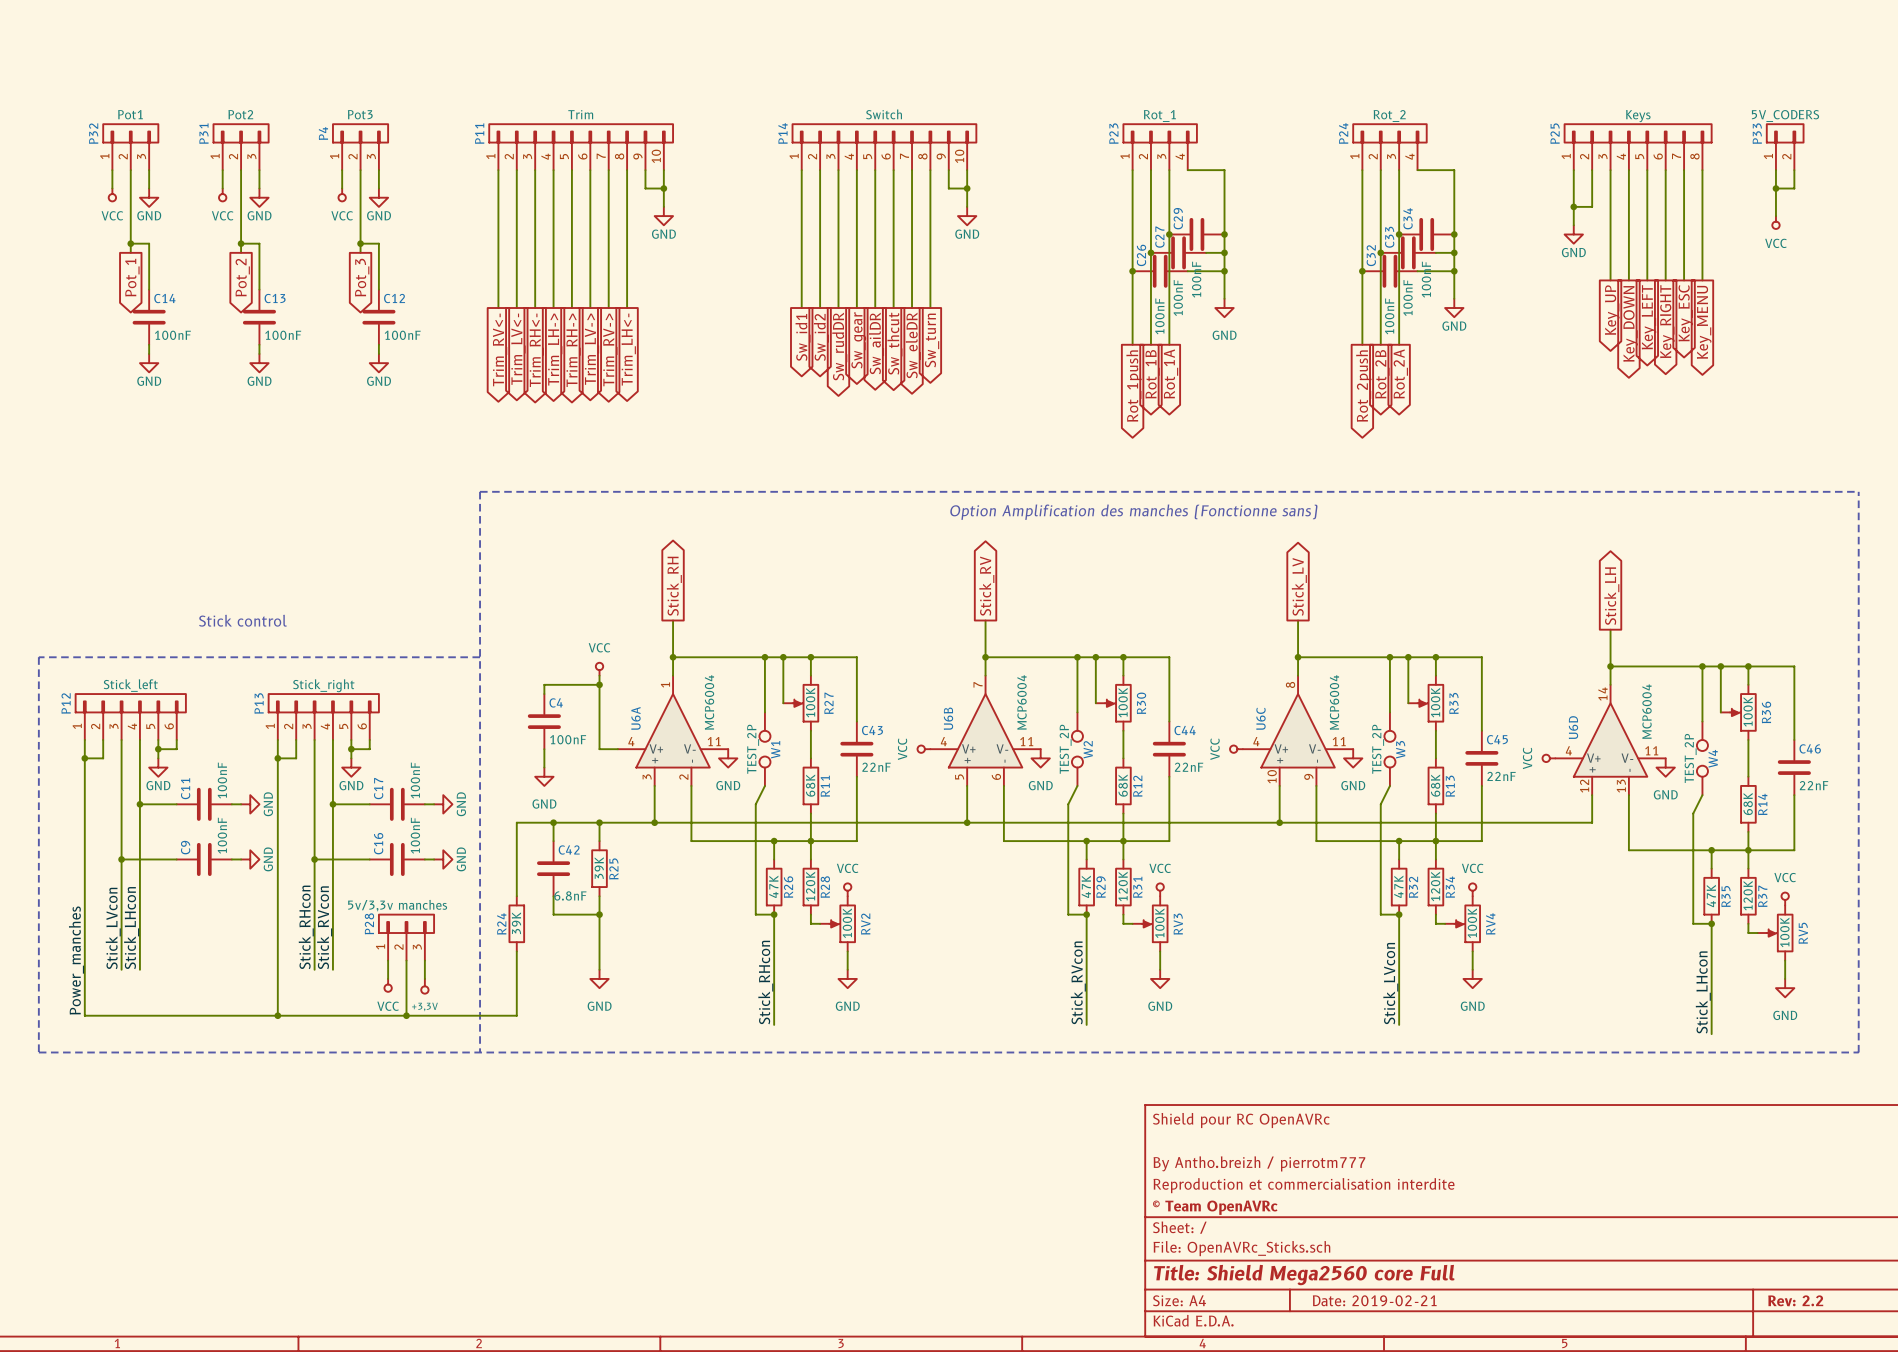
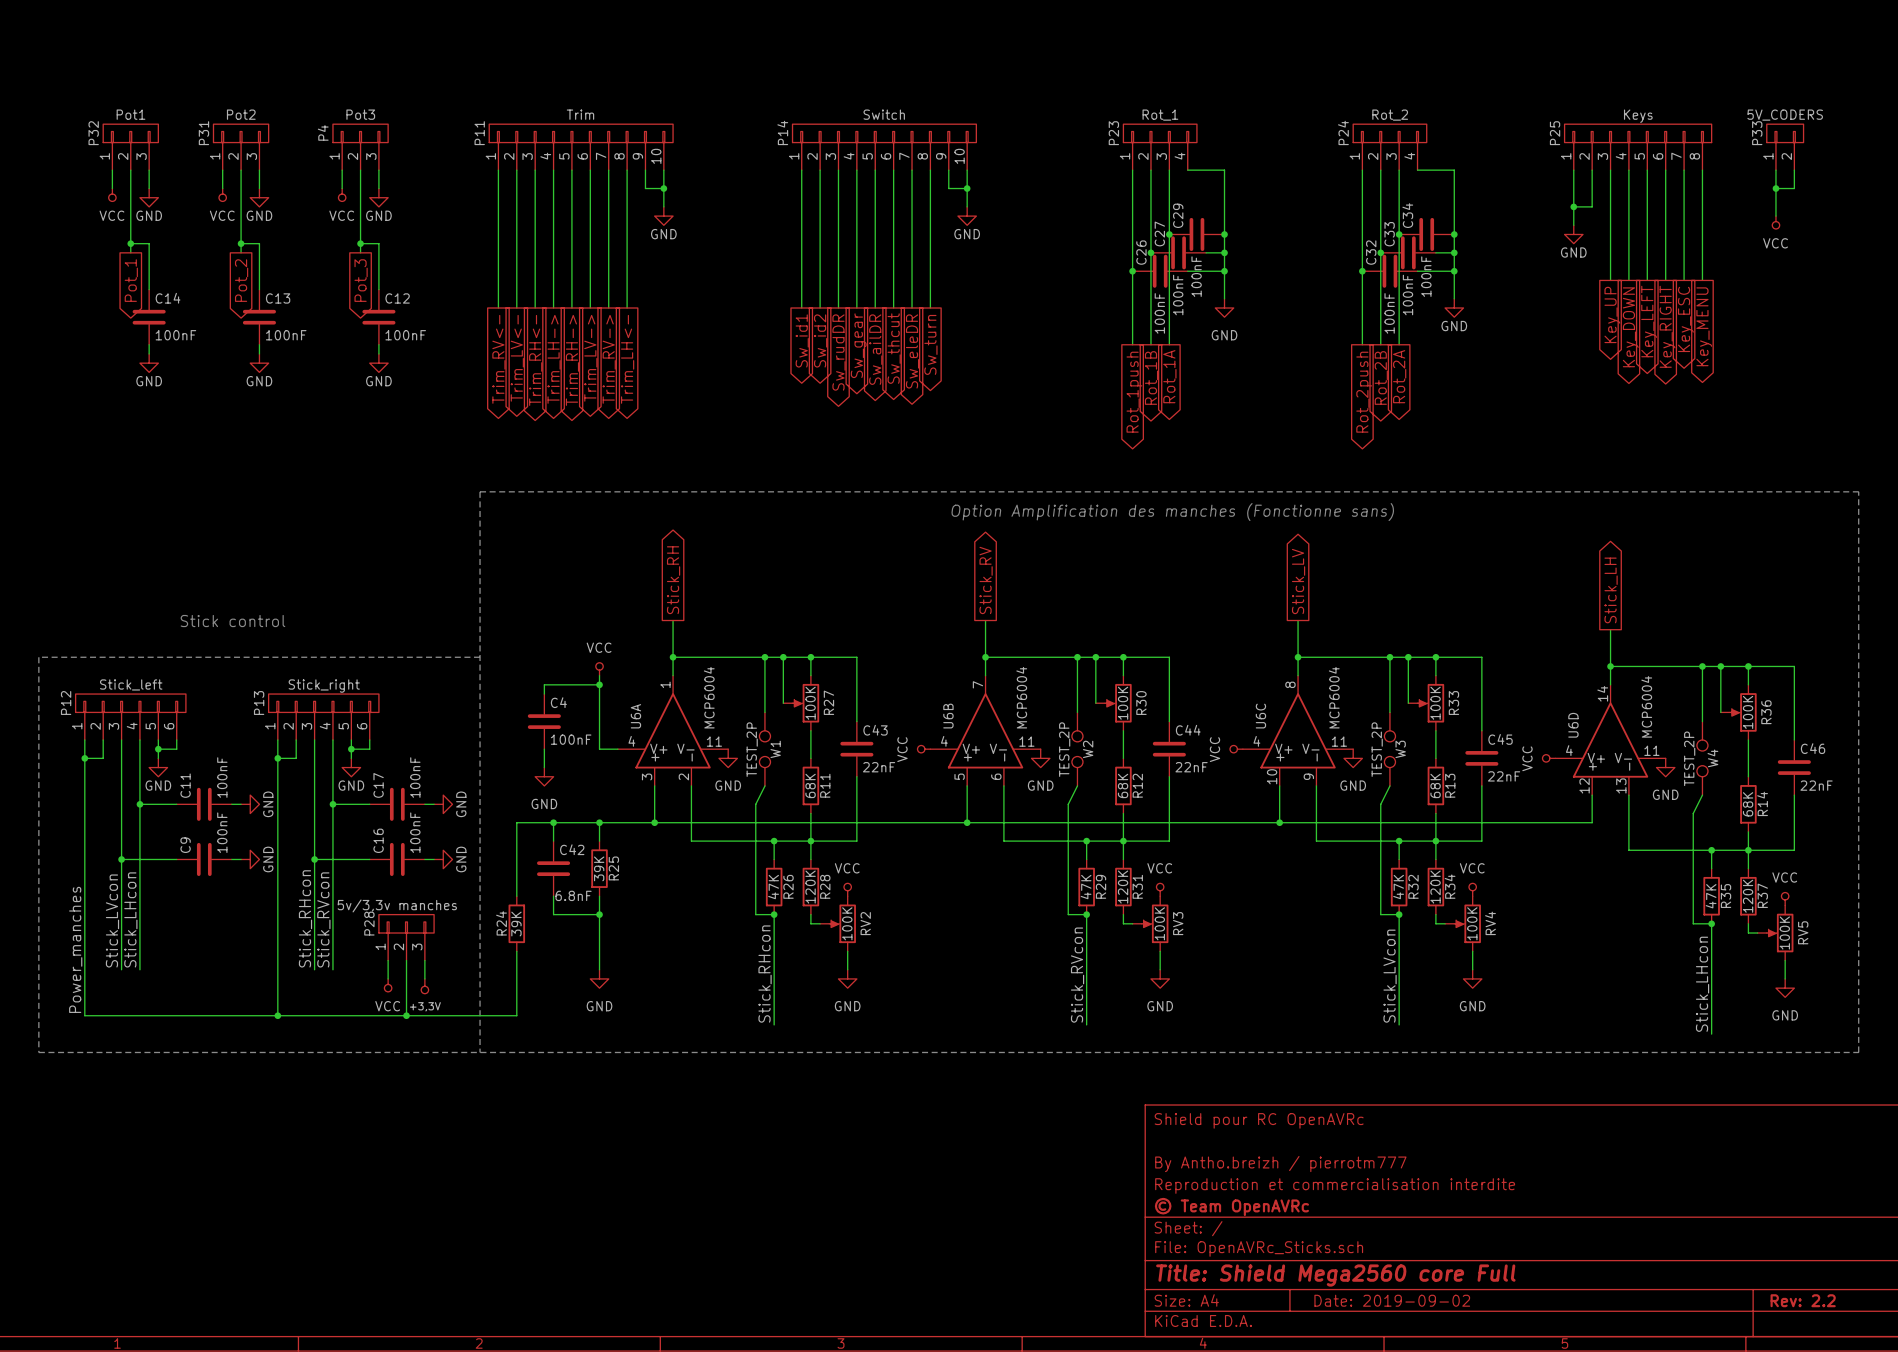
title block: Date: 2019-02-21 (1374, 1300) -> Date: 2019-09-02 (1392, 1300)

